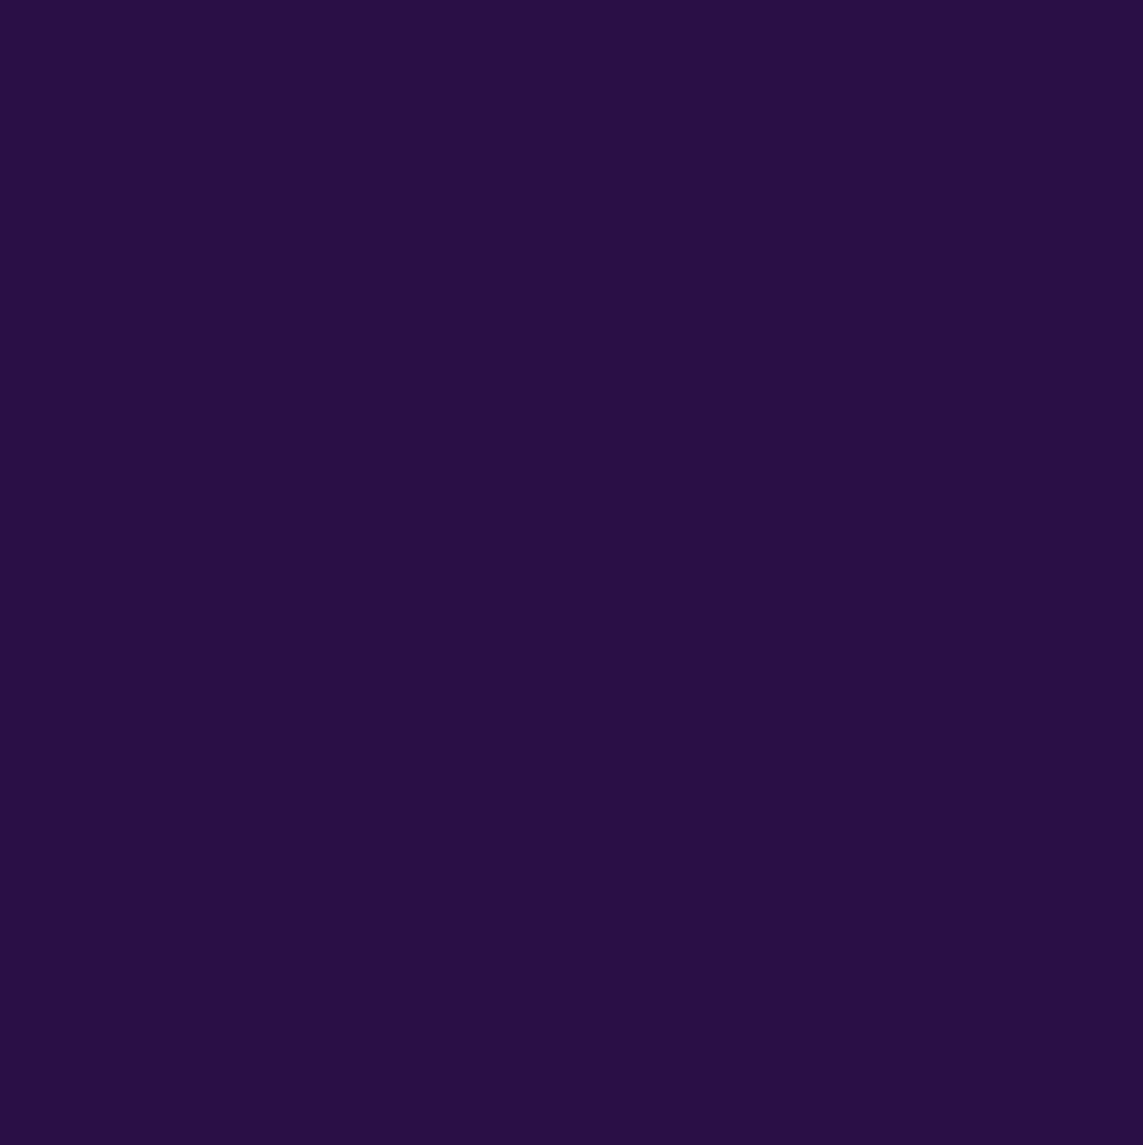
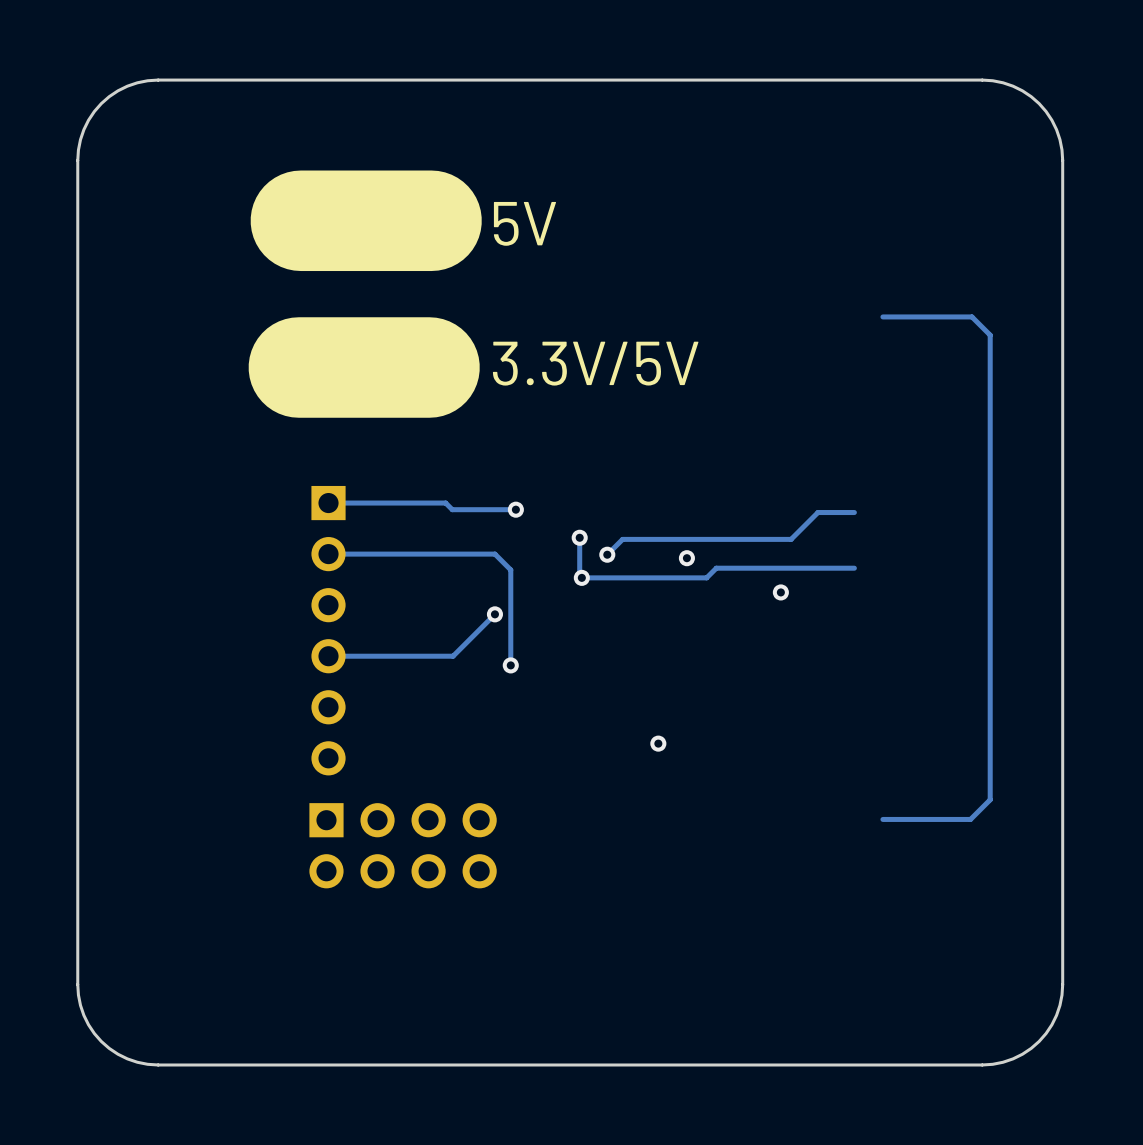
board edge: none -> (982, 80) (158, 80) (127, 86) (101, 103) (83, 129) (77, 160) (77, 984) (83, 1015) (101, 1041) (127, 1058) (158, 1064) (982, 1064) (1013, 1058) (1039, 1041) (1056, 1015) (1062, 984) (1062, 160) (1056, 129) (1039, 103) (1013, 86) (982, 80)
line: none -> (431, 220) (300, 220)
text: none -> 5V (525, 223)
track: none -> (882, 316) (971, 316) (990, 335) (990, 799) (970, 819) (882, 819)
line: none -> (429, 367) (298, 367)
text: none -> 3.3V/5V (595, 363)
track: none -> (328, 503) (445, 503) (452, 509) (515, 509)
via: none -> (515, 509)
track: none -> (854, 512) (817, 512) (791, 539) (622, 539) (607, 554)
track: none -> (579, 537) (579, 575) (581, 577) (706, 577) (716, 568) (854, 568)
via: none -> (579, 537)
track: none -> (328, 554) (494, 554) (510, 569) (510, 665)
via: none -> (607, 554)
via: none -> (686, 558)
via: none -> (581, 577)
via: none -> (780, 592)
track: none -> (494, 614) (453, 656) (328, 656)
via: none -> (494, 614)
part: none -> (328, 630)
via: none -> (510, 665)
via: none -> (658, 743)
part: none -> (403, 845)

